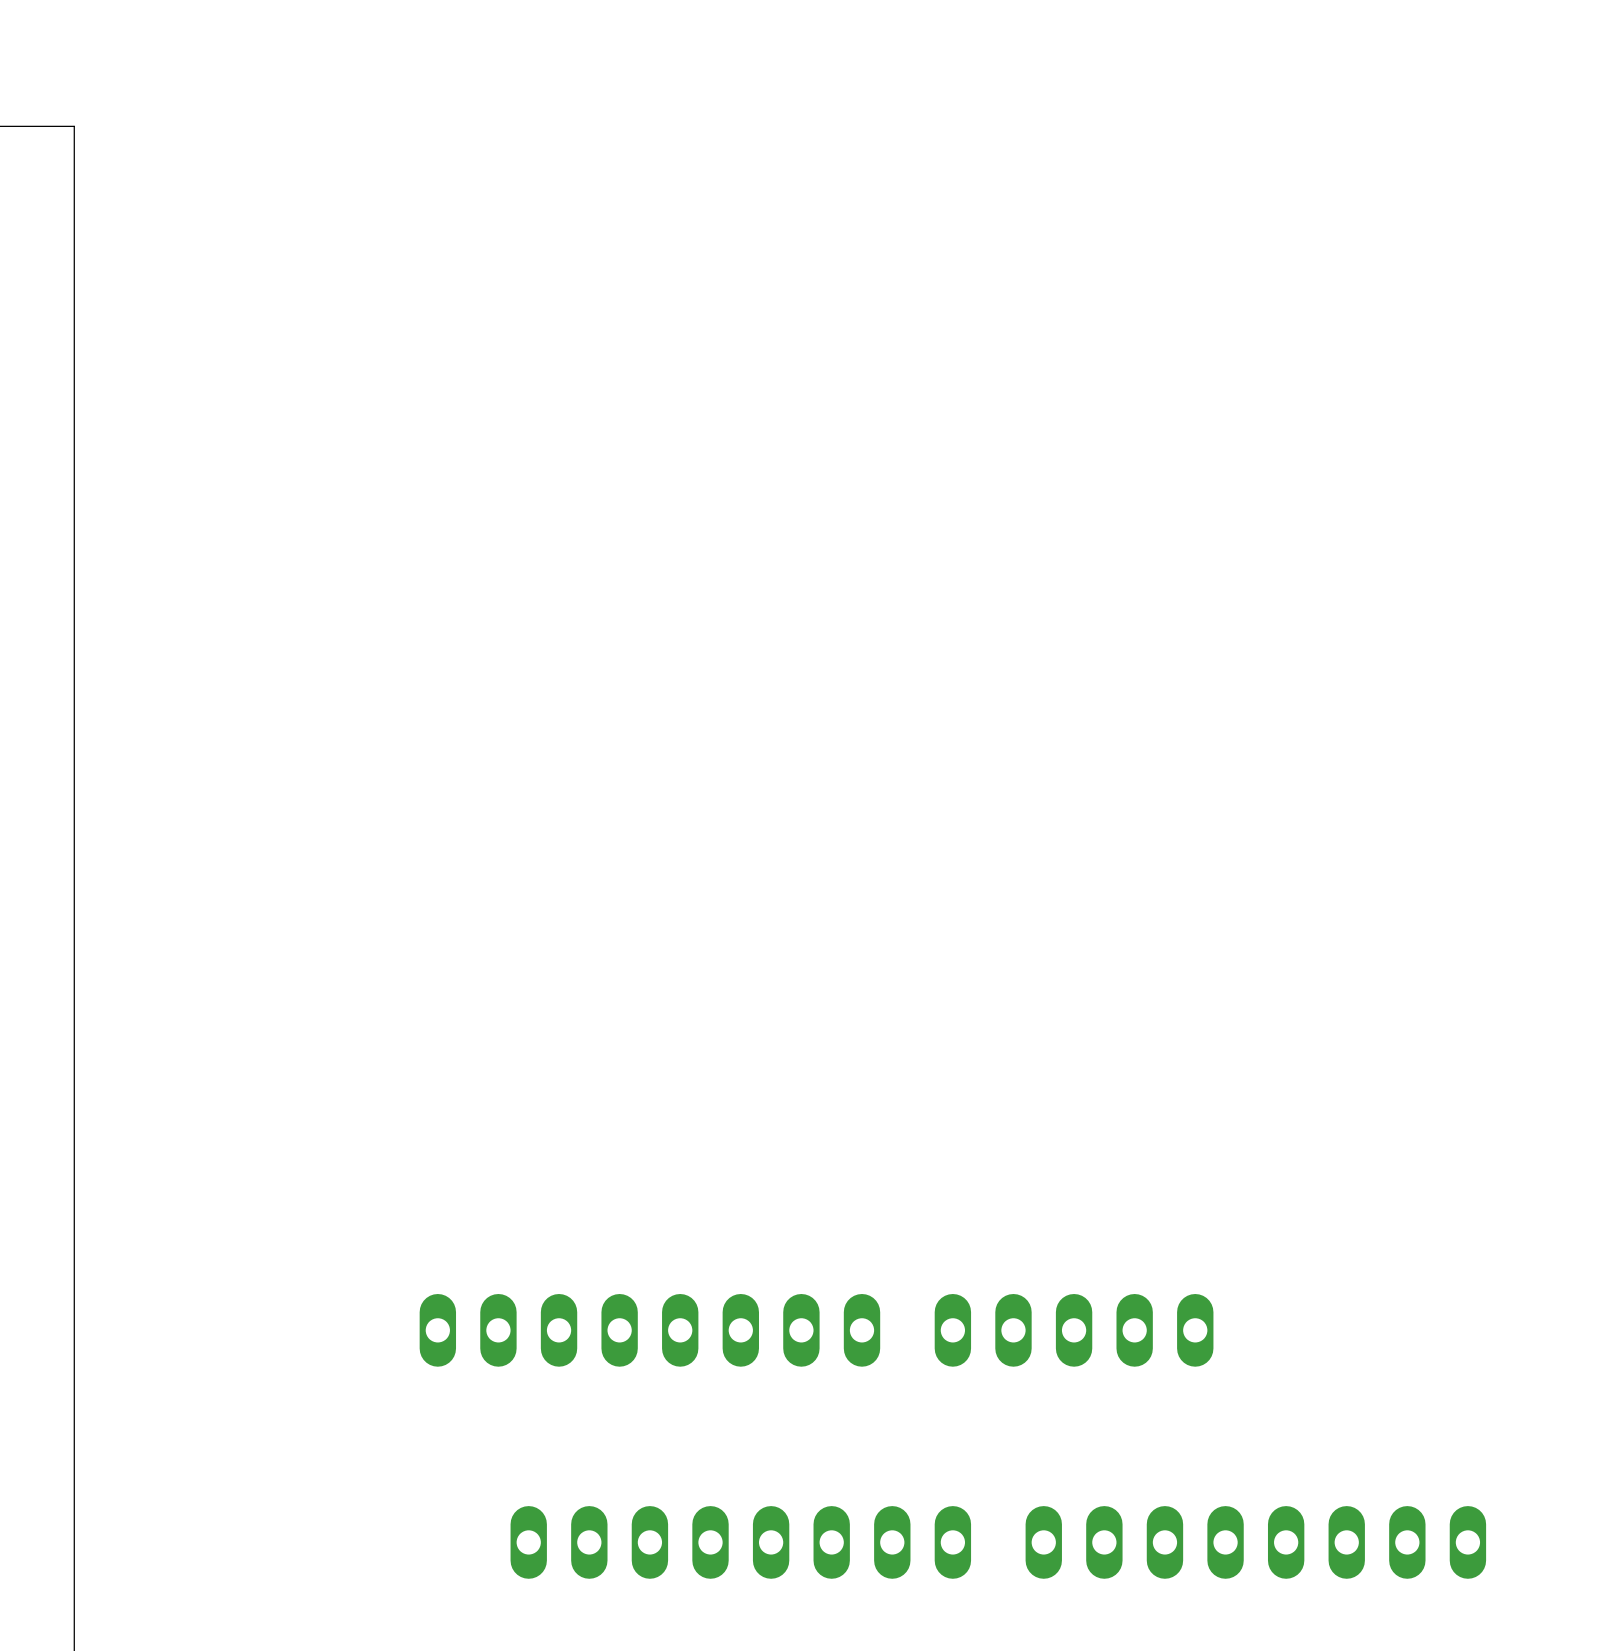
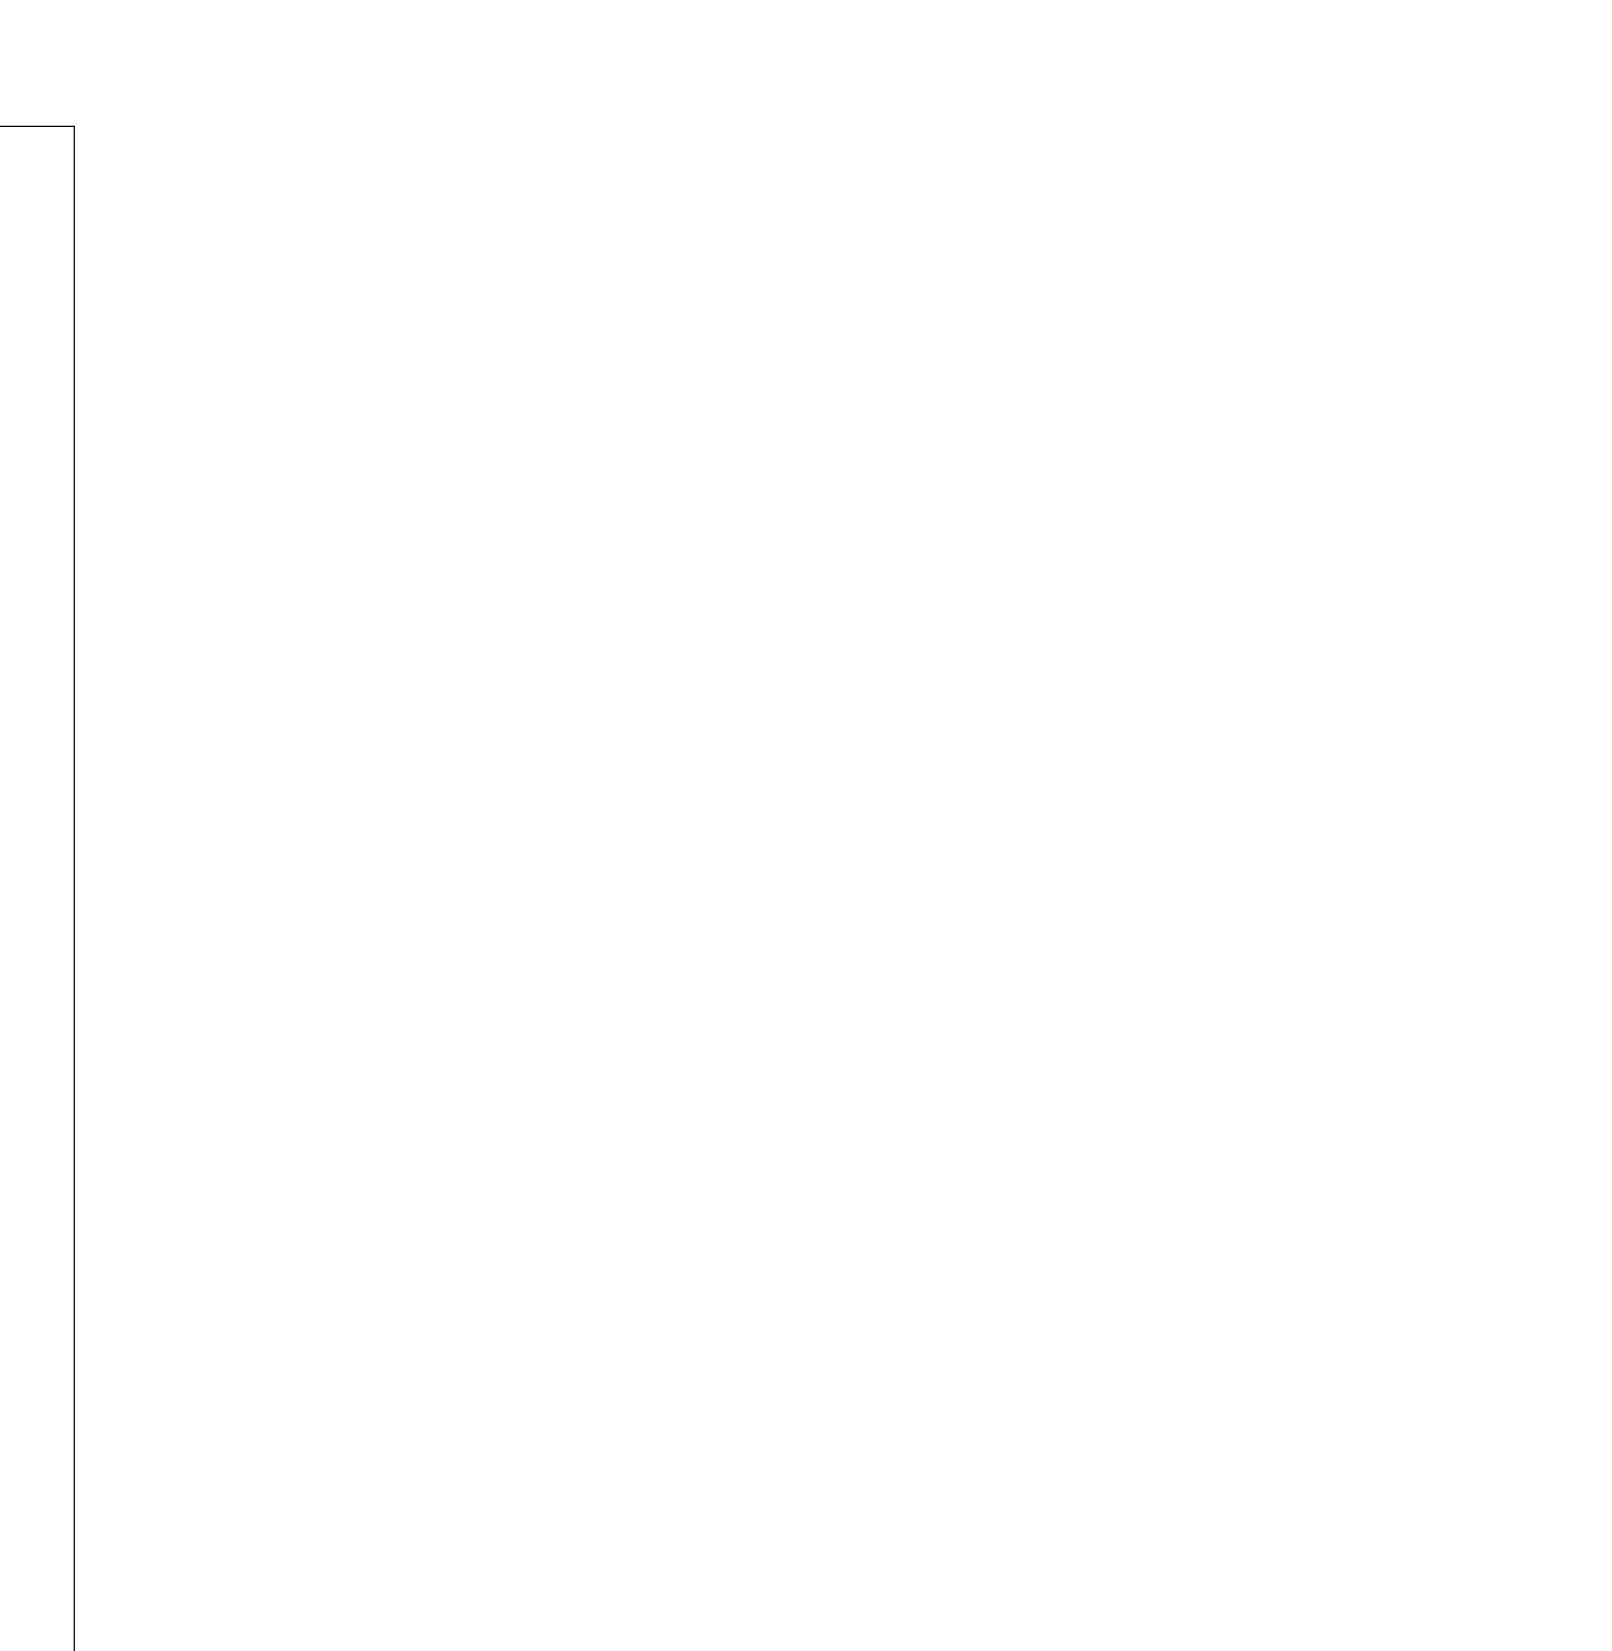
part: (649, 1330) -> none
part: (1074, 1330) -> none
part: (740, 1542) -> none
part: (1255, 1542) -> none

